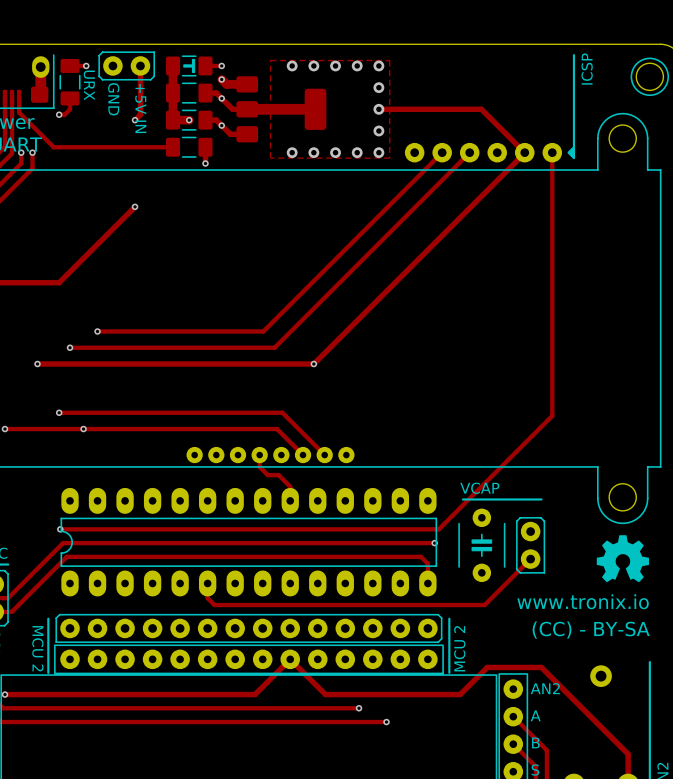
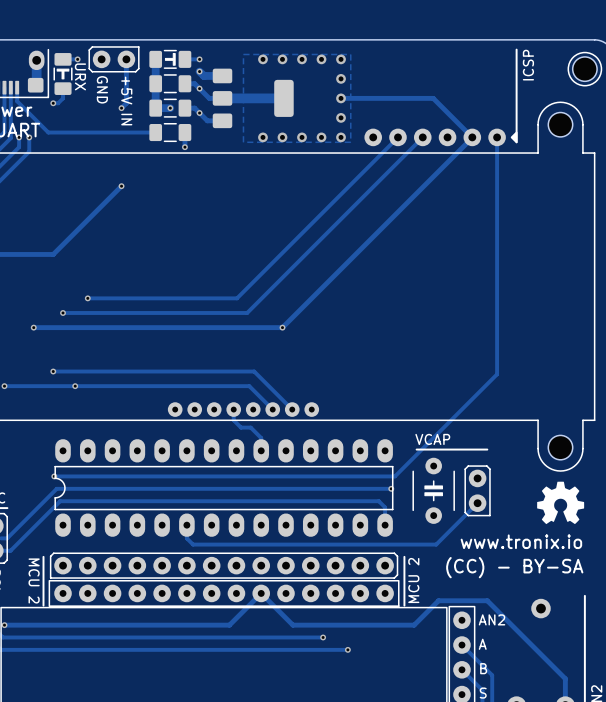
part footprint: [59, 58, 81, 106] -> [53, 53, 73, 95]

